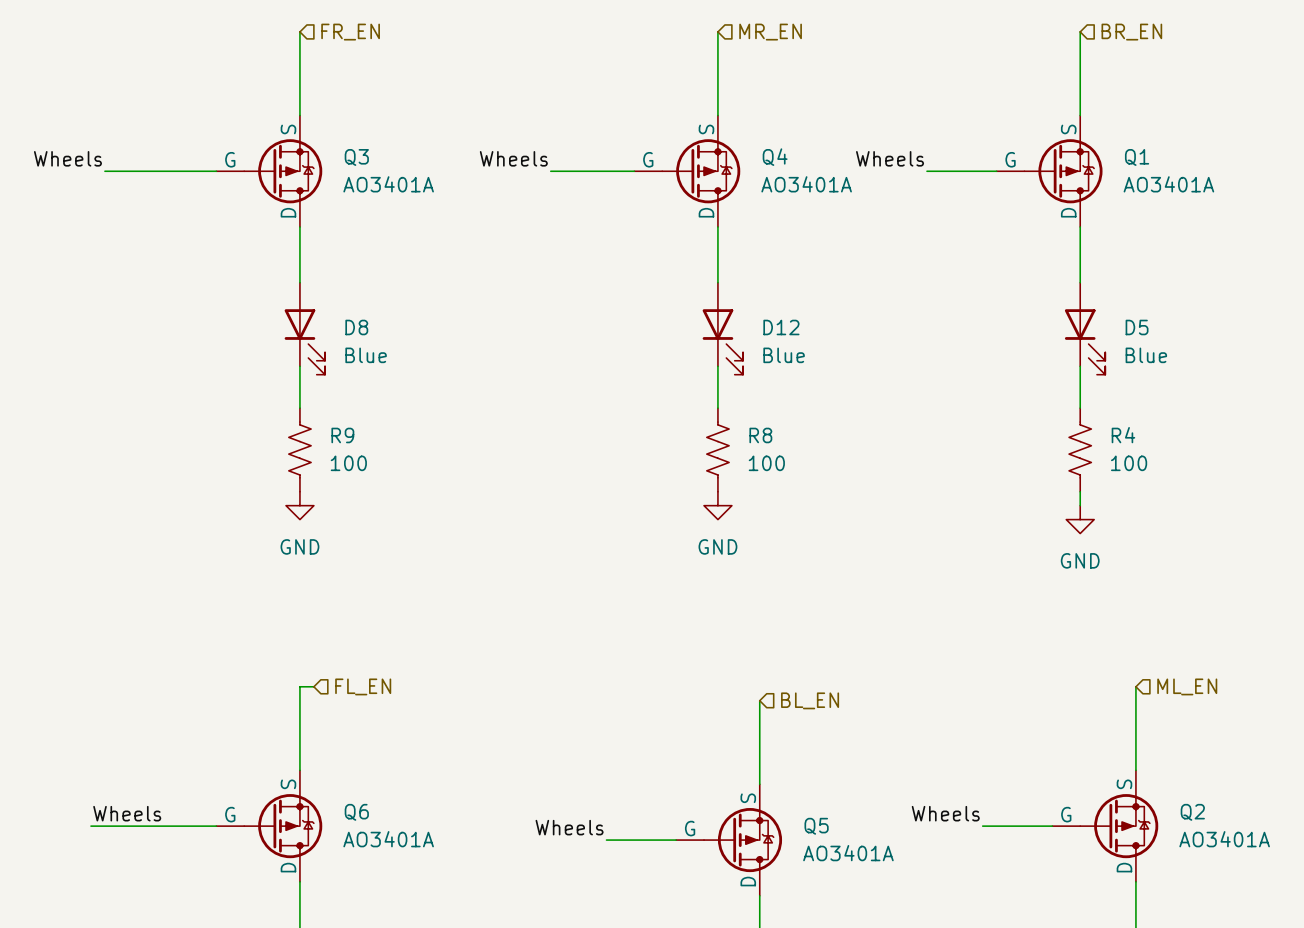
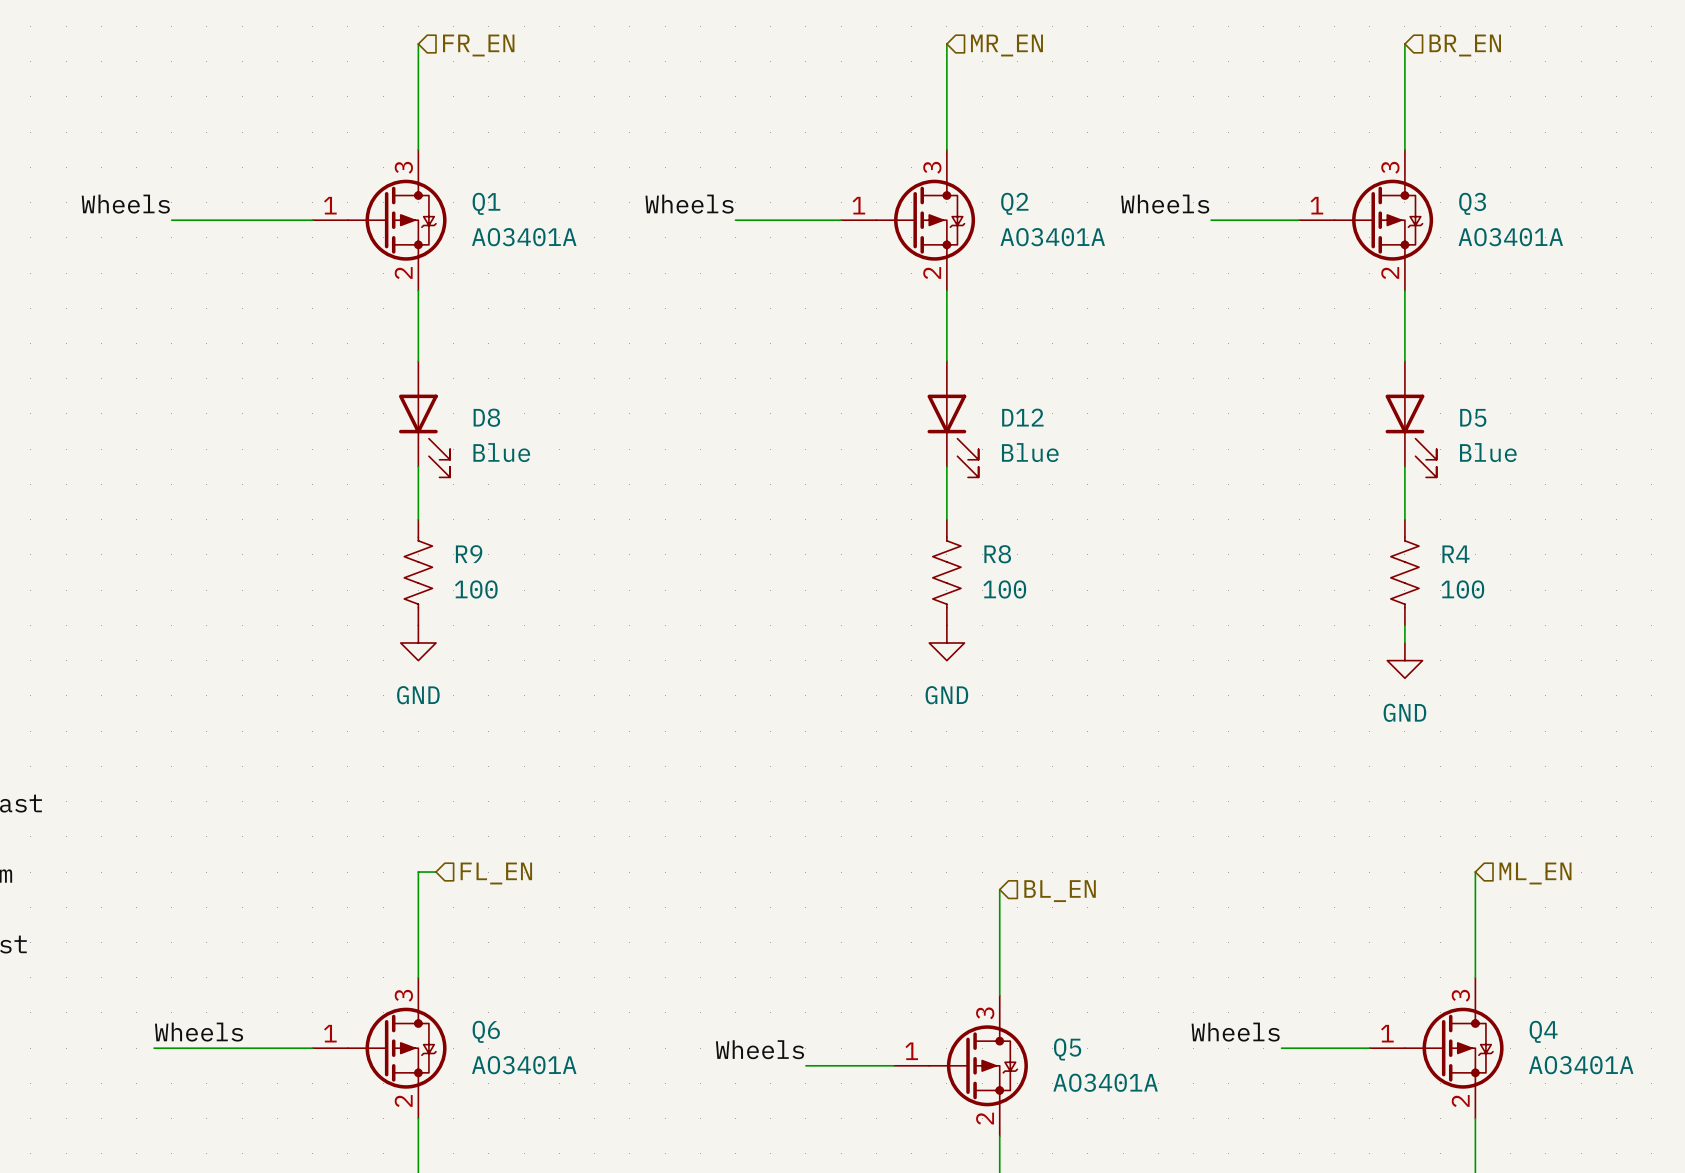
Q3 symbol: [216, 115, 323, 227] -> [1299, 149, 1434, 291]
Q4 symbol: [634, 115, 741, 227] -> [1369, 977, 1504, 1119]
Q1 symbol: [996, 115, 1103, 227] -> [312, 149, 447, 291]
Q6 symbol: [216, 770, 323, 882] -> [312, 977, 447, 1119]
Q2 symbol: [1052, 770, 1159, 882] -> [841, 149, 976, 291]
Q5 symbol: [676, 784, 783, 896] -> [894, 995, 1028, 1137]

